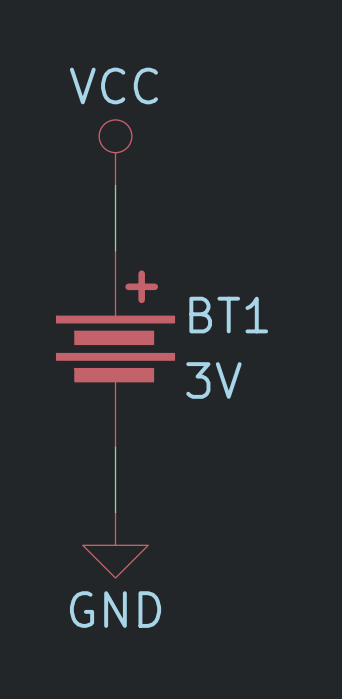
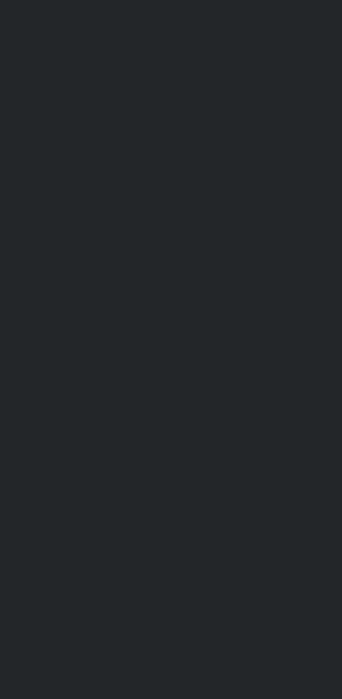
power symbol: VCC (115, 152) -> none
wire: (115, 185) (115, 250) -> none
BT1: 3V (115, 348) -> none
wire: (115, 447) (115, 512) -> none
power symbol: GND (115, 545) -> none

